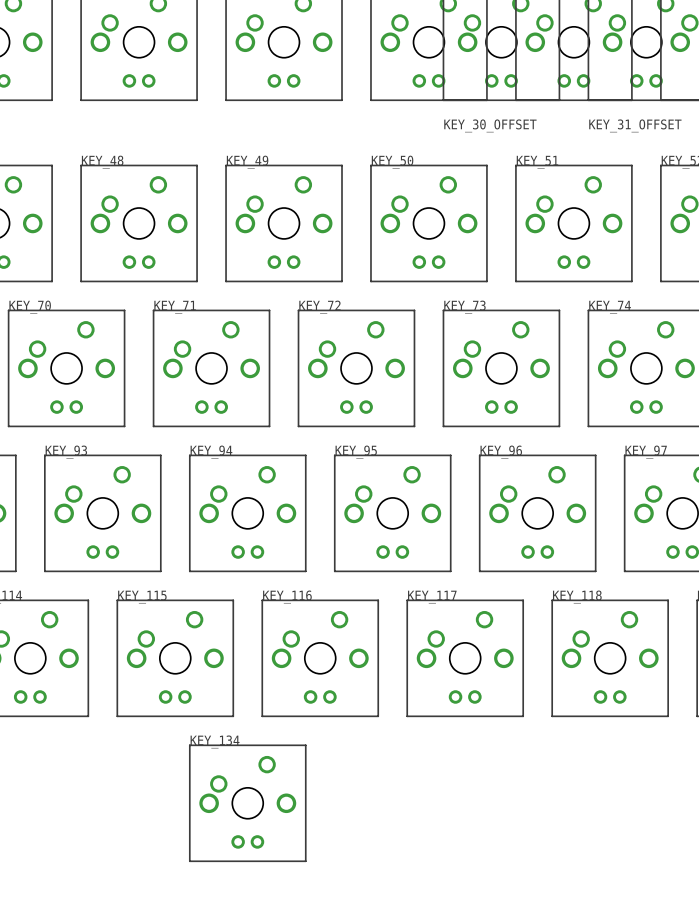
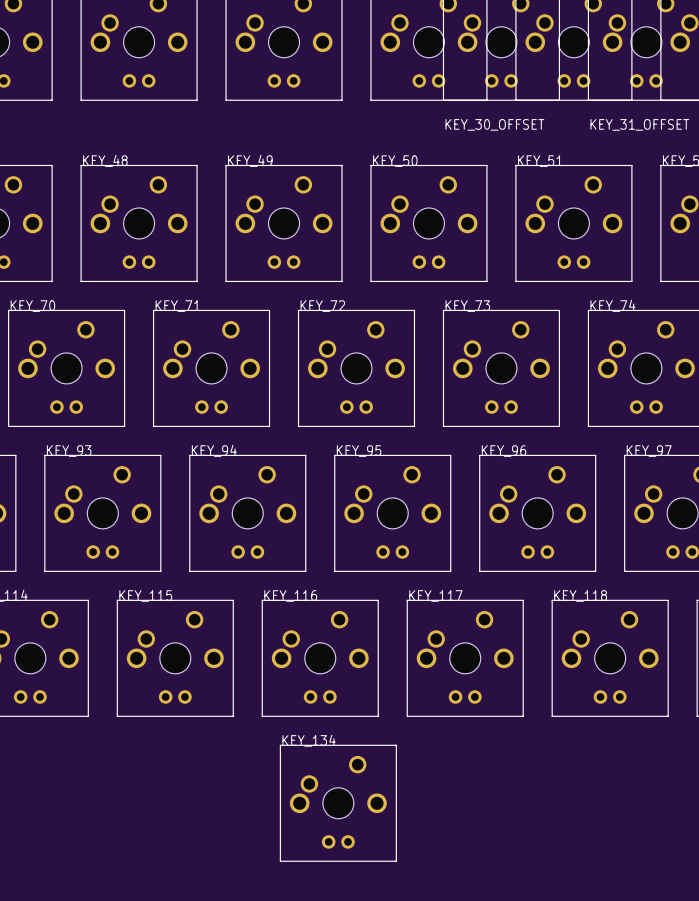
KEY_134 position: (247, 803) -> (338, 803)

